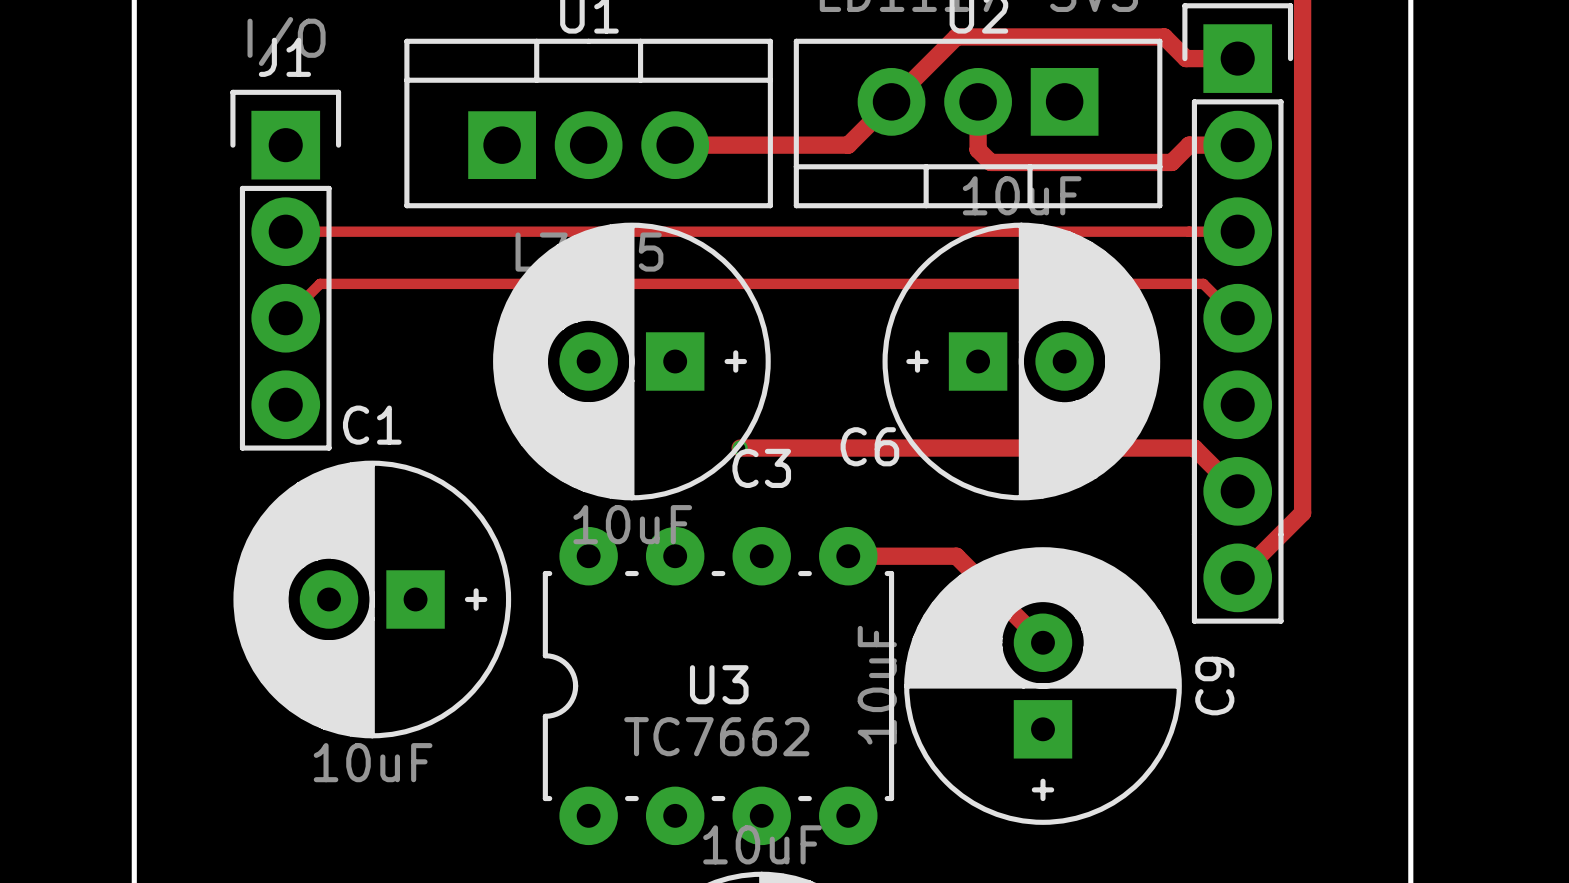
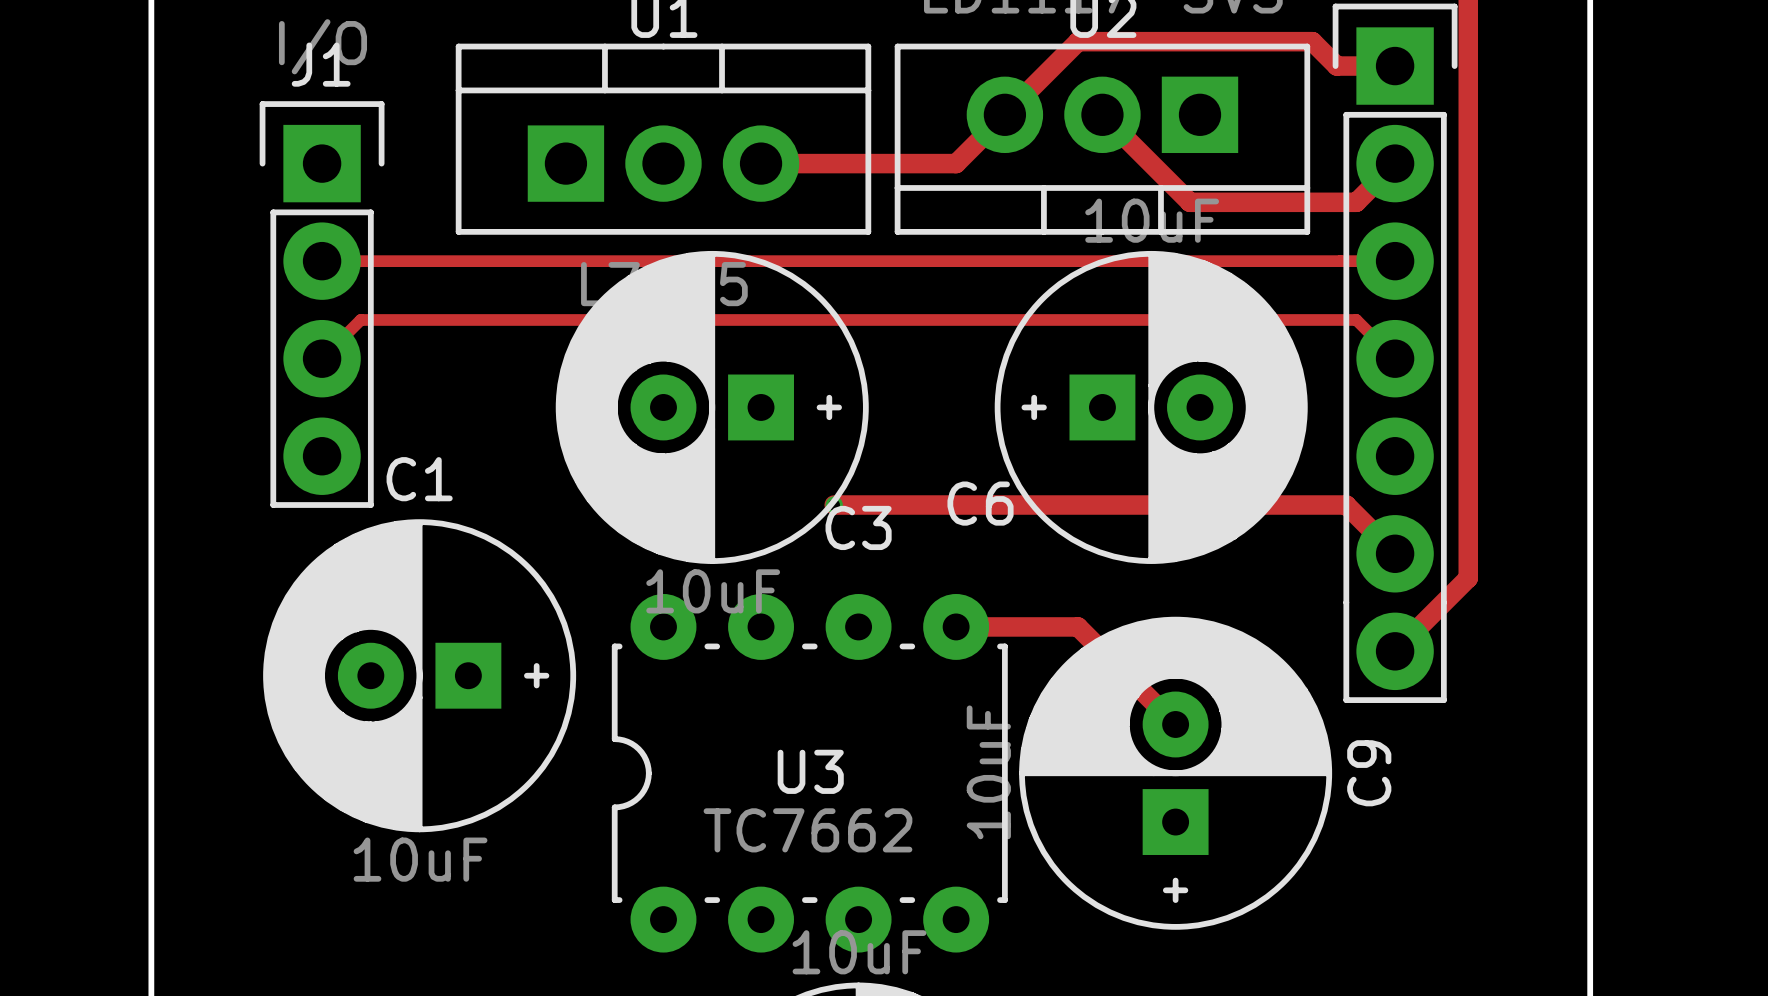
track: (978, 101) (978, 149) (990, 162) (1171, 162) (1189, 145) (1237, 145) -> (1102, 114) (1189, 202) (1356, 202) (1395, 163)

